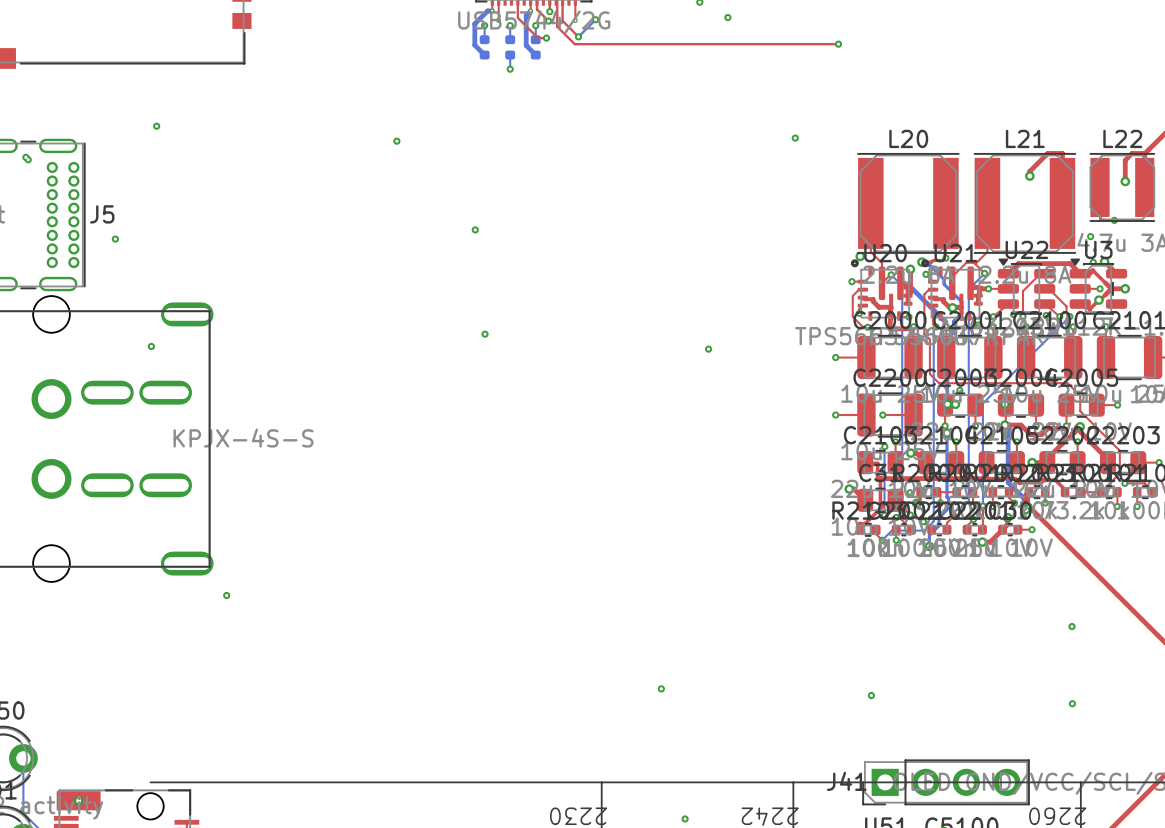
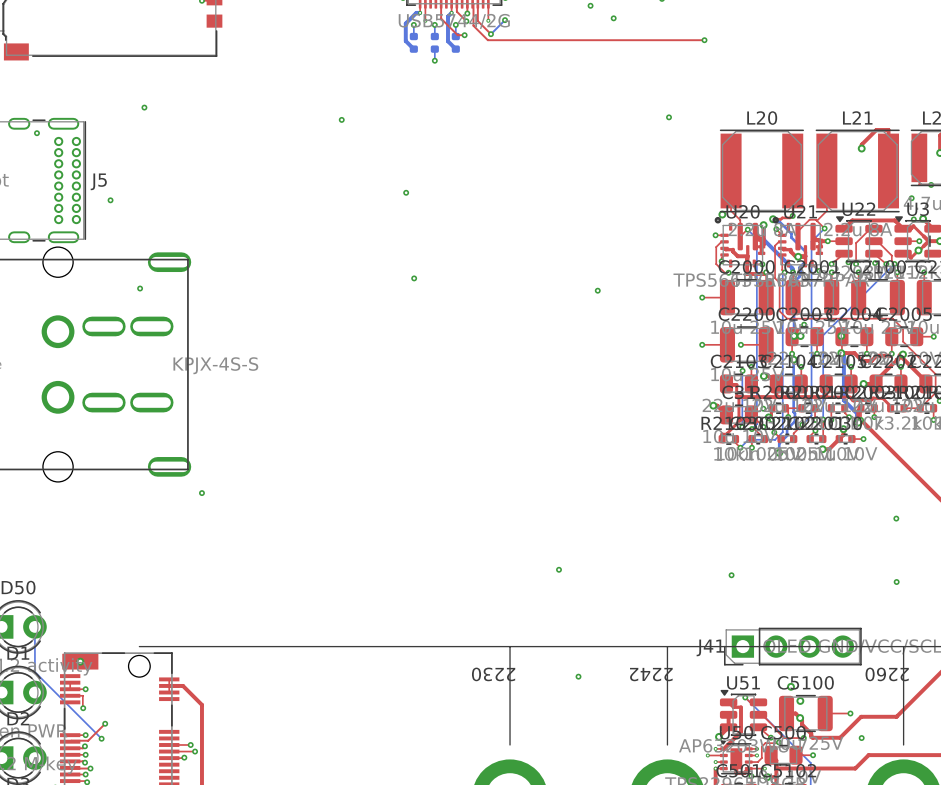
via: (28, 159) -> none

